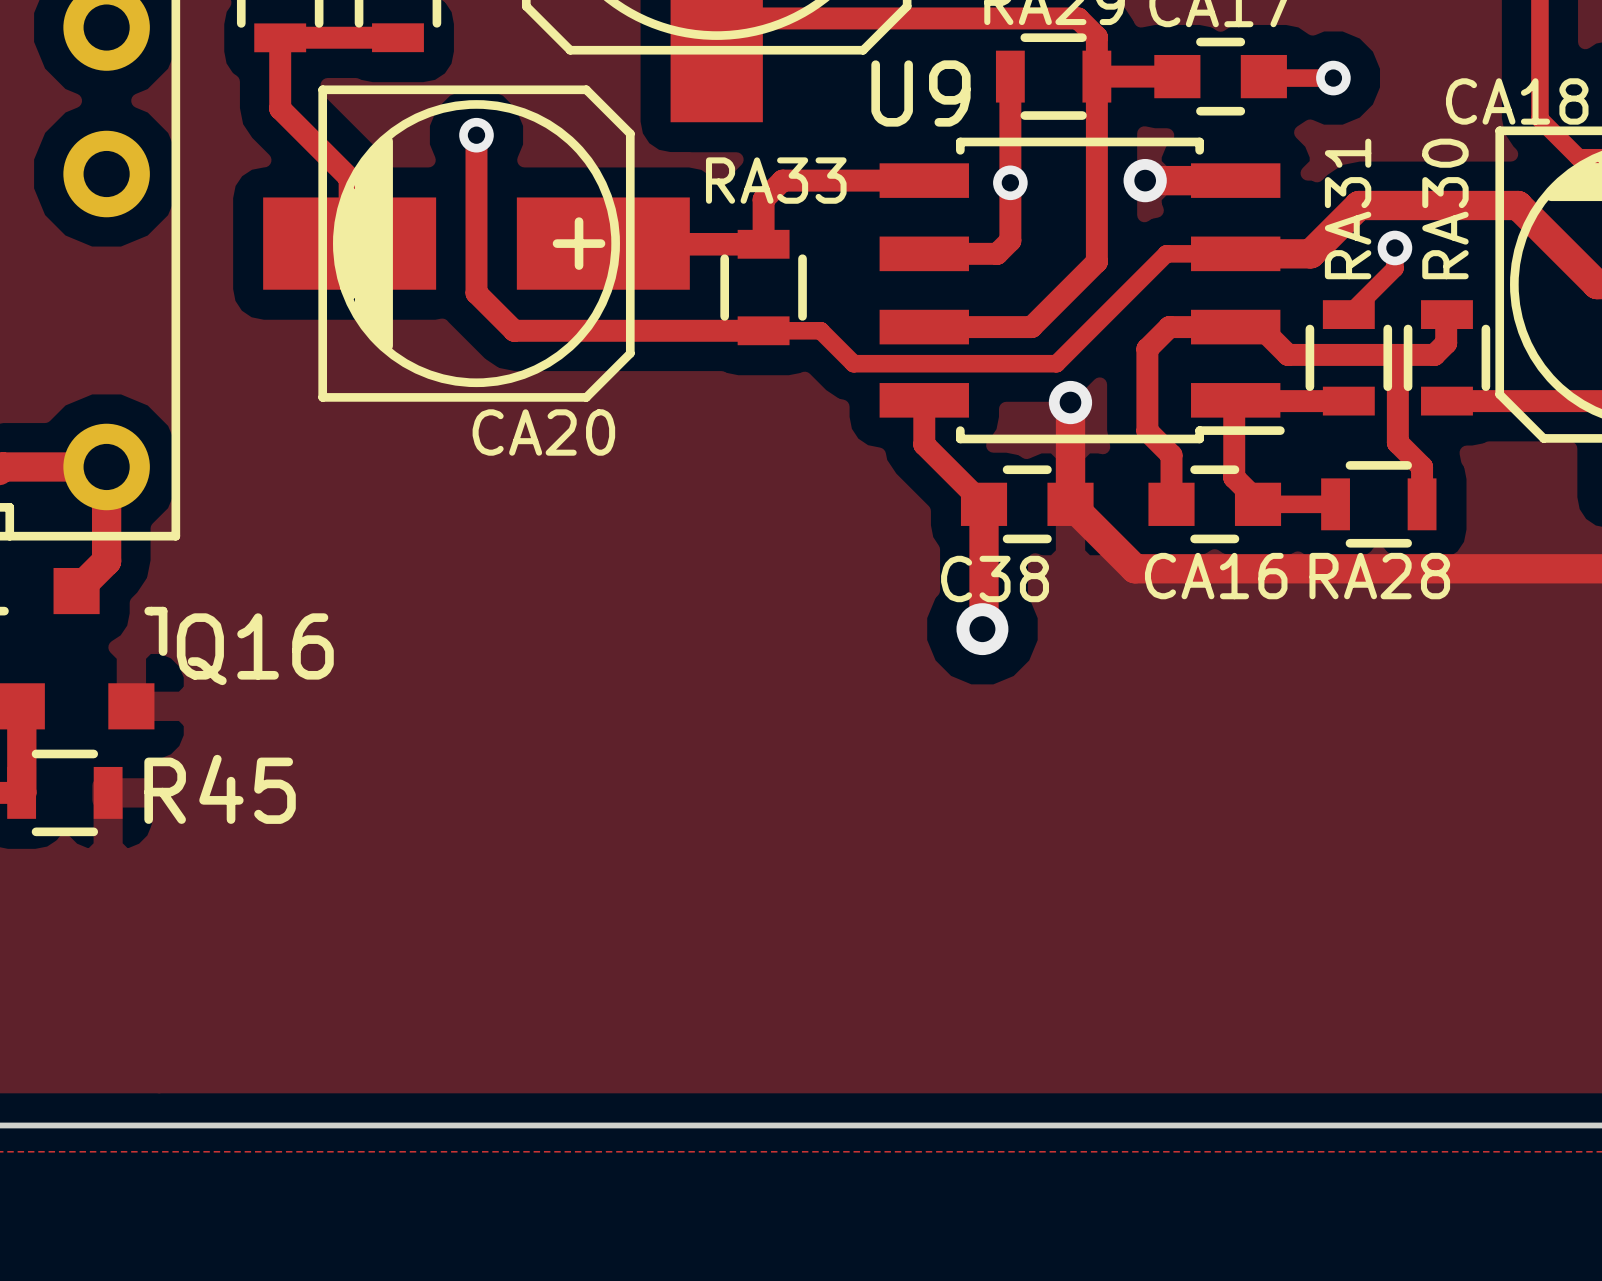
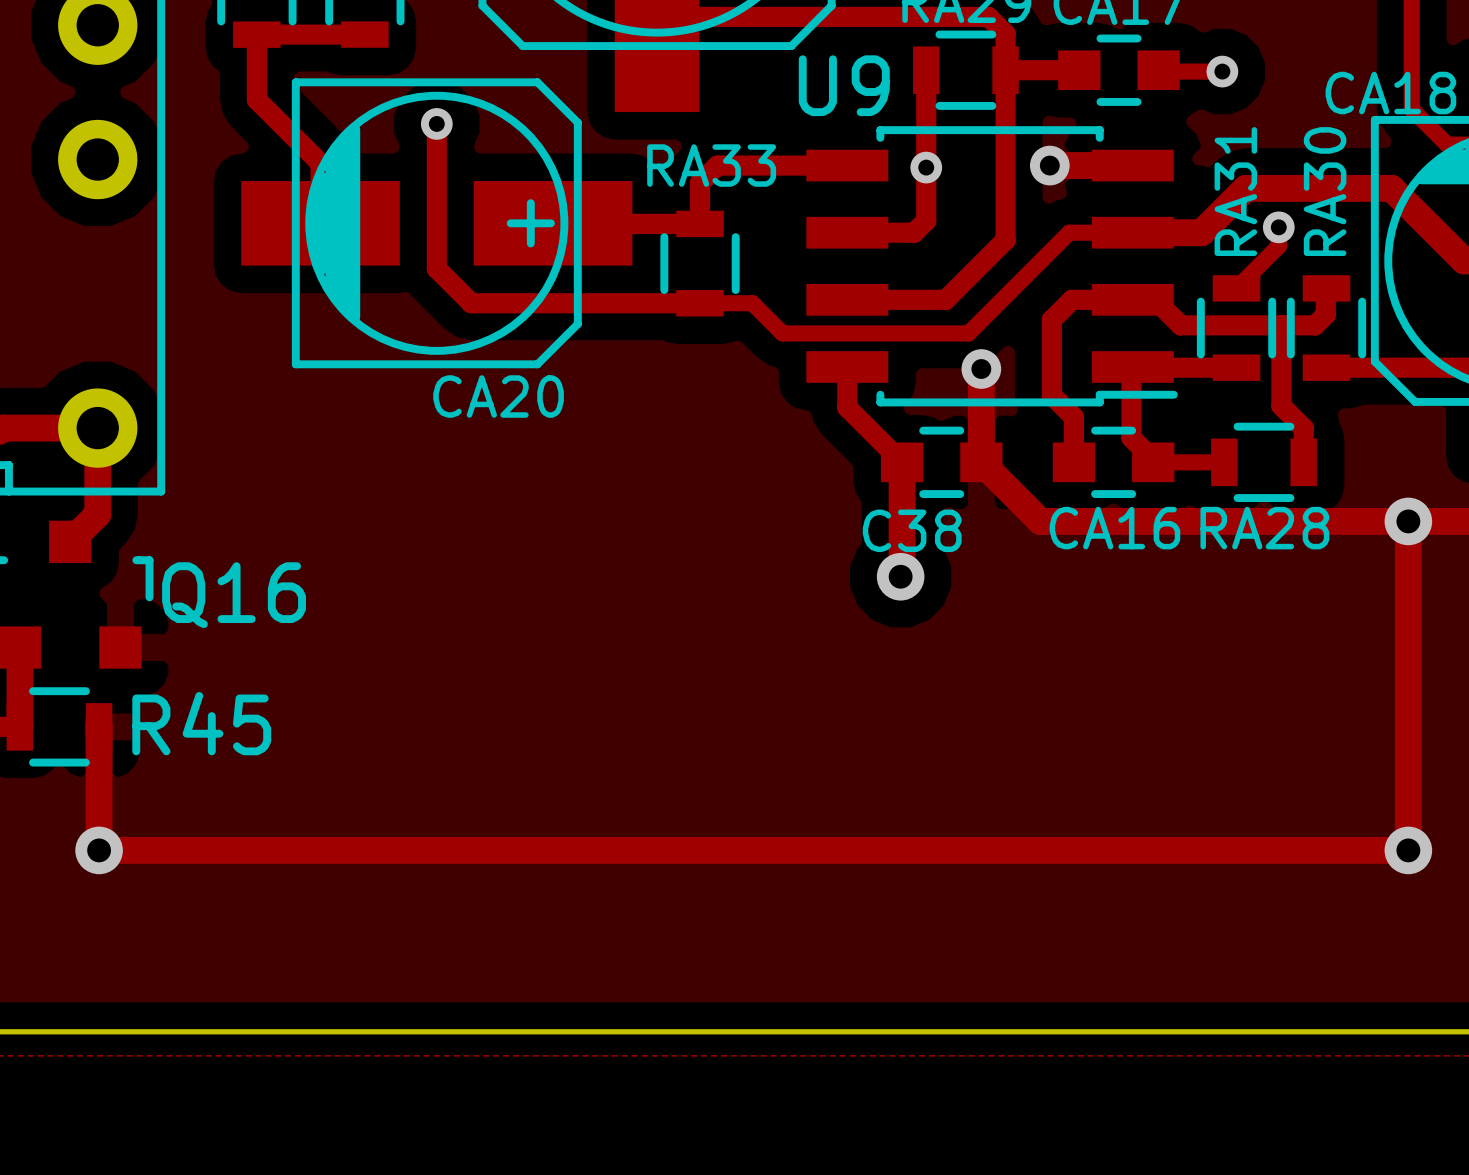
track: none -> (1408, 521) (1408, 850) (99, 850) (99, 726)
via: none -> (1408, 521)
via: none -> (99, 850)
via: none -> (1408, 850)

